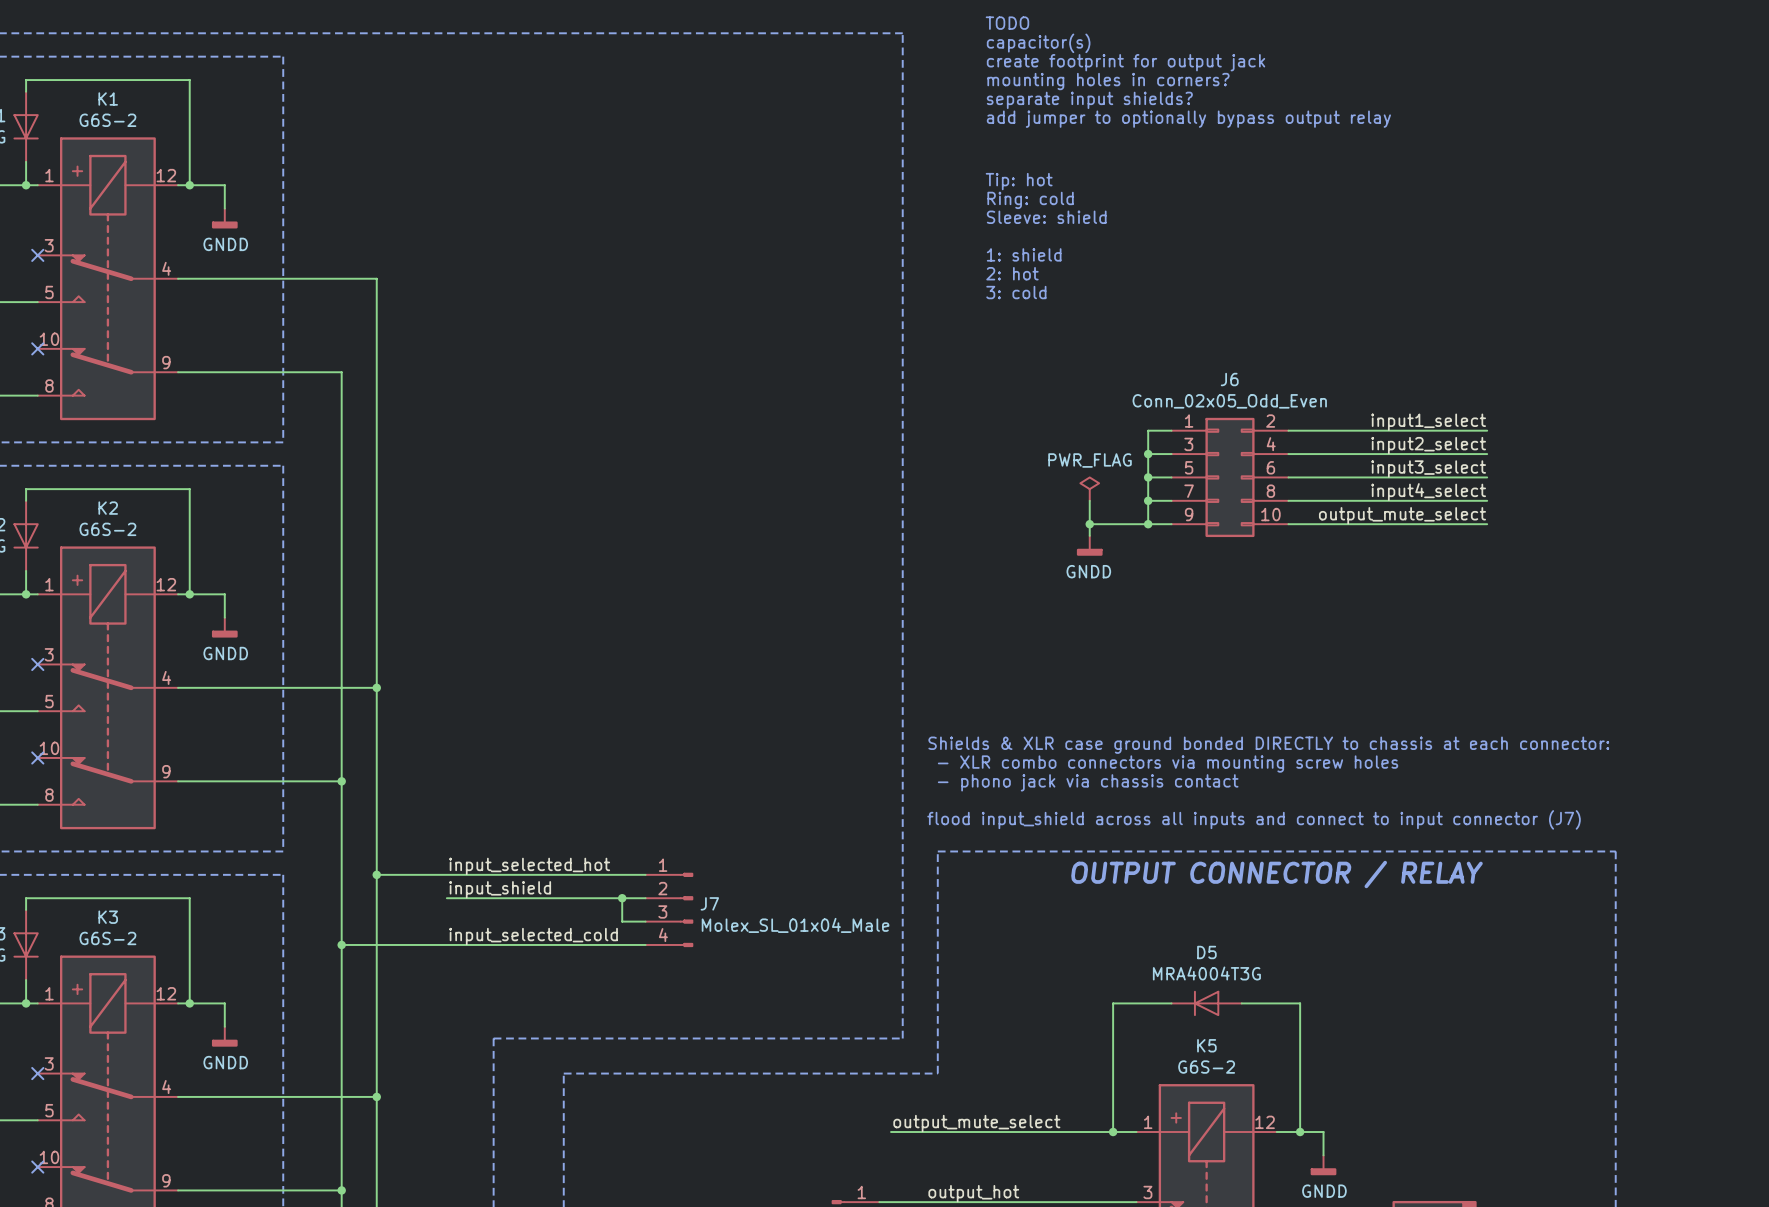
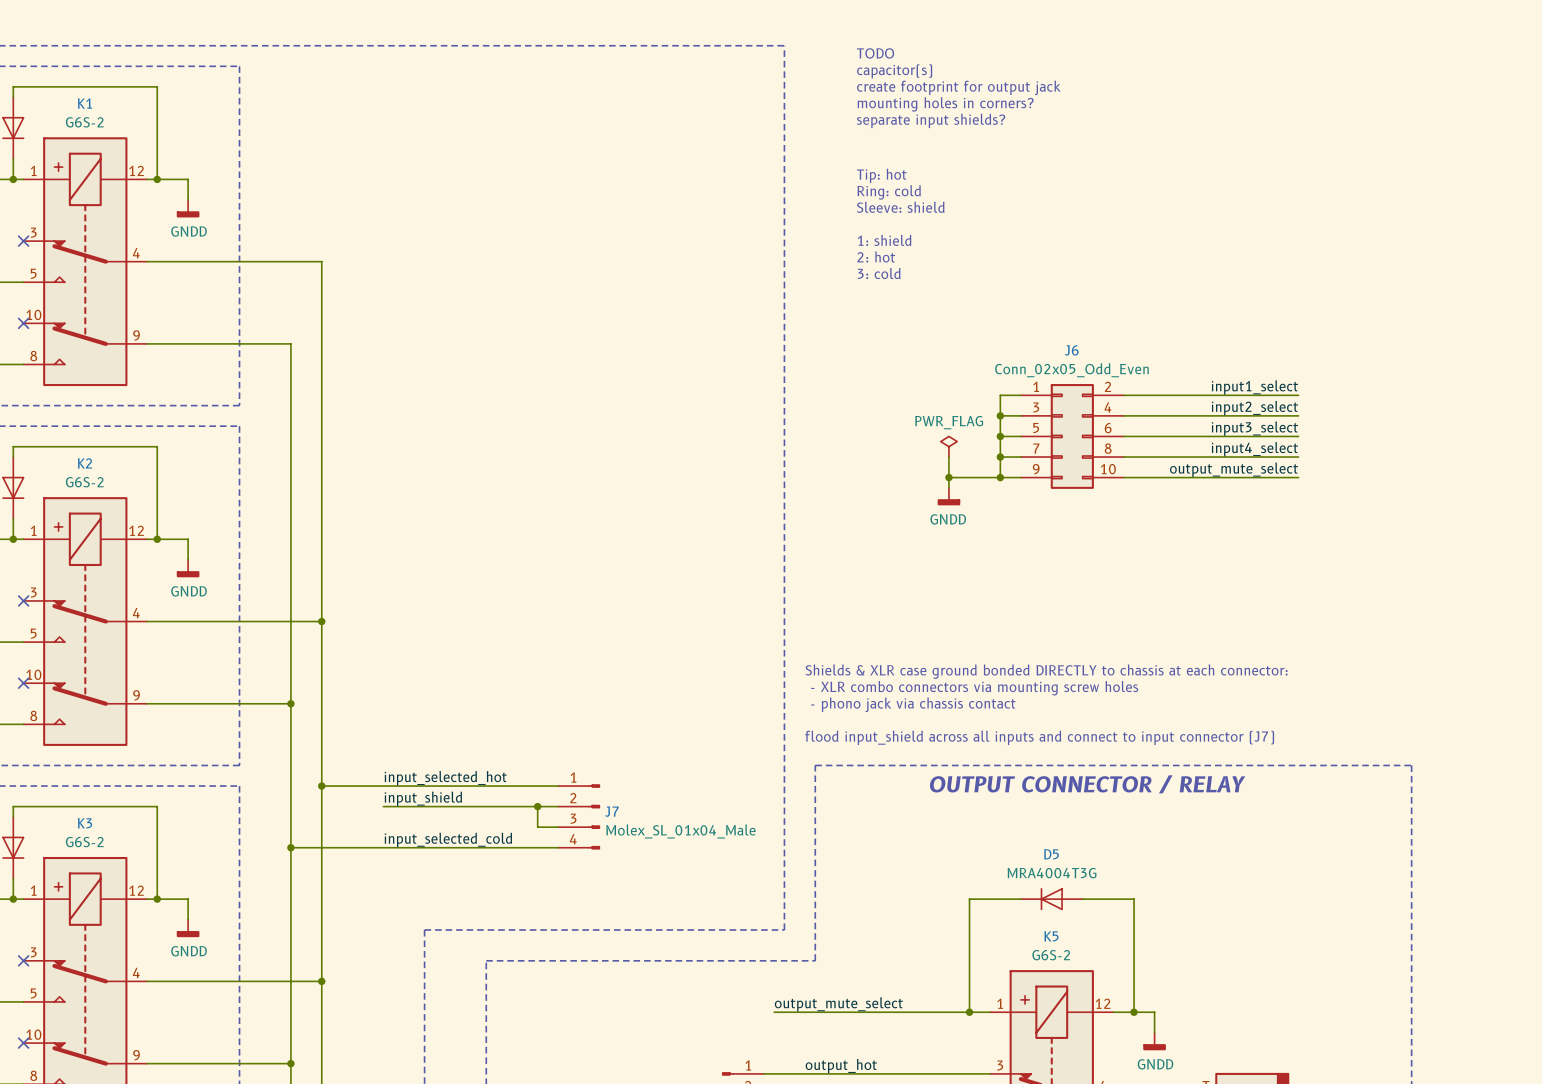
text: TODO (1007, 23) -> none
text: capacitor(s) (1038, 43) -> TODO (875, 53)
text: create footprint for output jack (1126, 62) -> capacitor(s) (894, 71)
text: mounting holes in corners? (1108, 81) -> create footprint for output jack (958, 87)
text: separate input shields? (1089, 100) -> mounting holes in corners? (945, 104)
text: add jumper to optionally bypass output relay (1188, 119) -> separate input shields? (931, 120)

